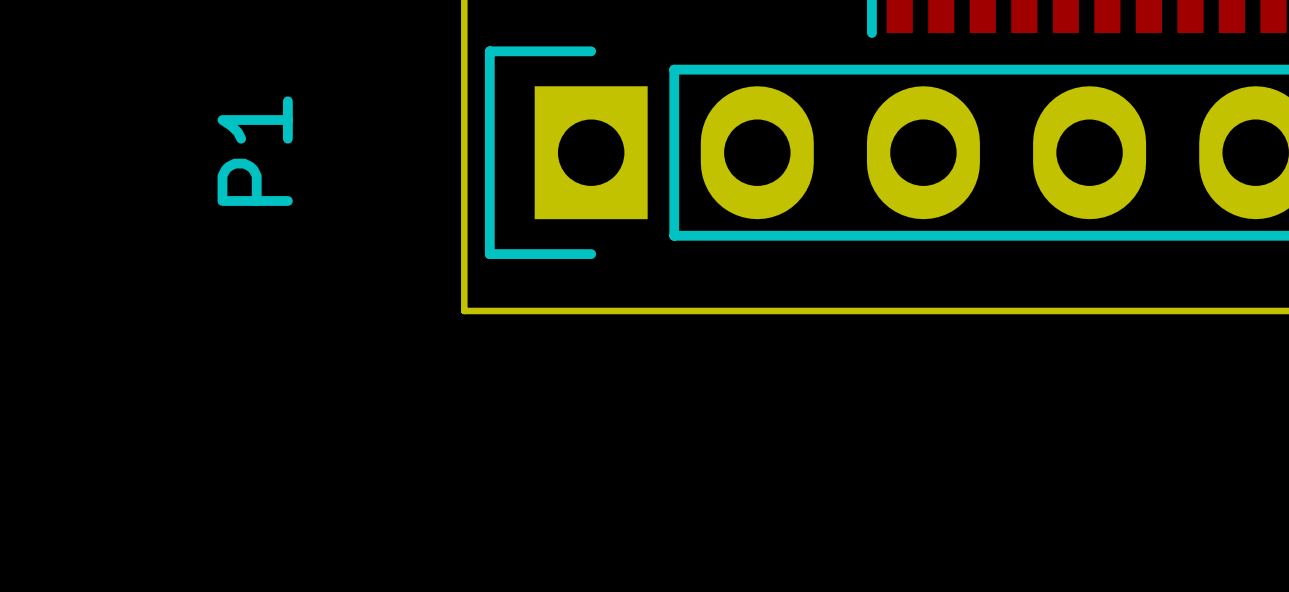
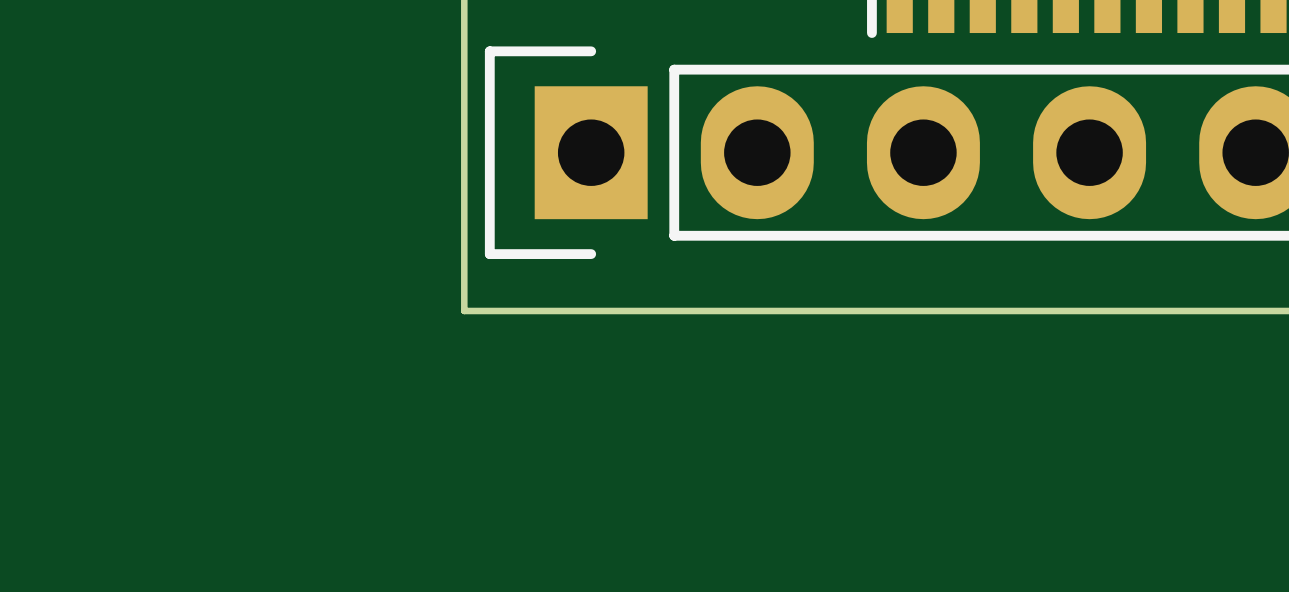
P1 name: P1 (255, 151) -> none

